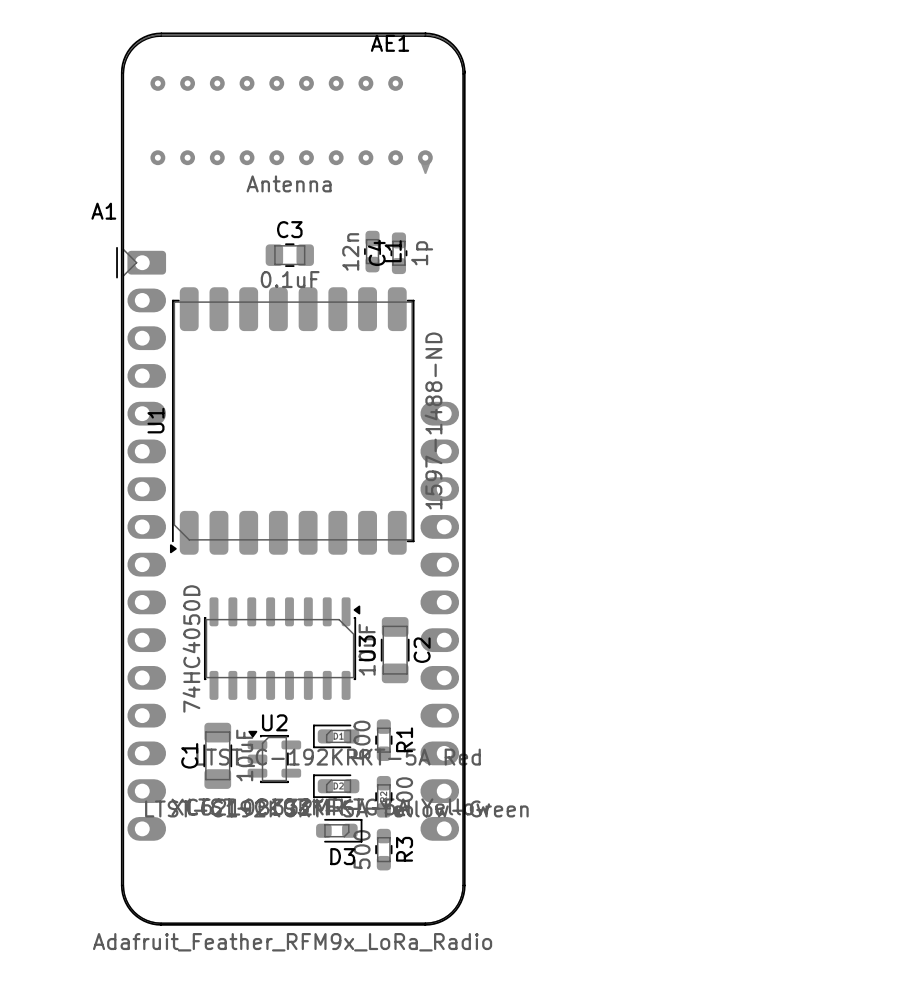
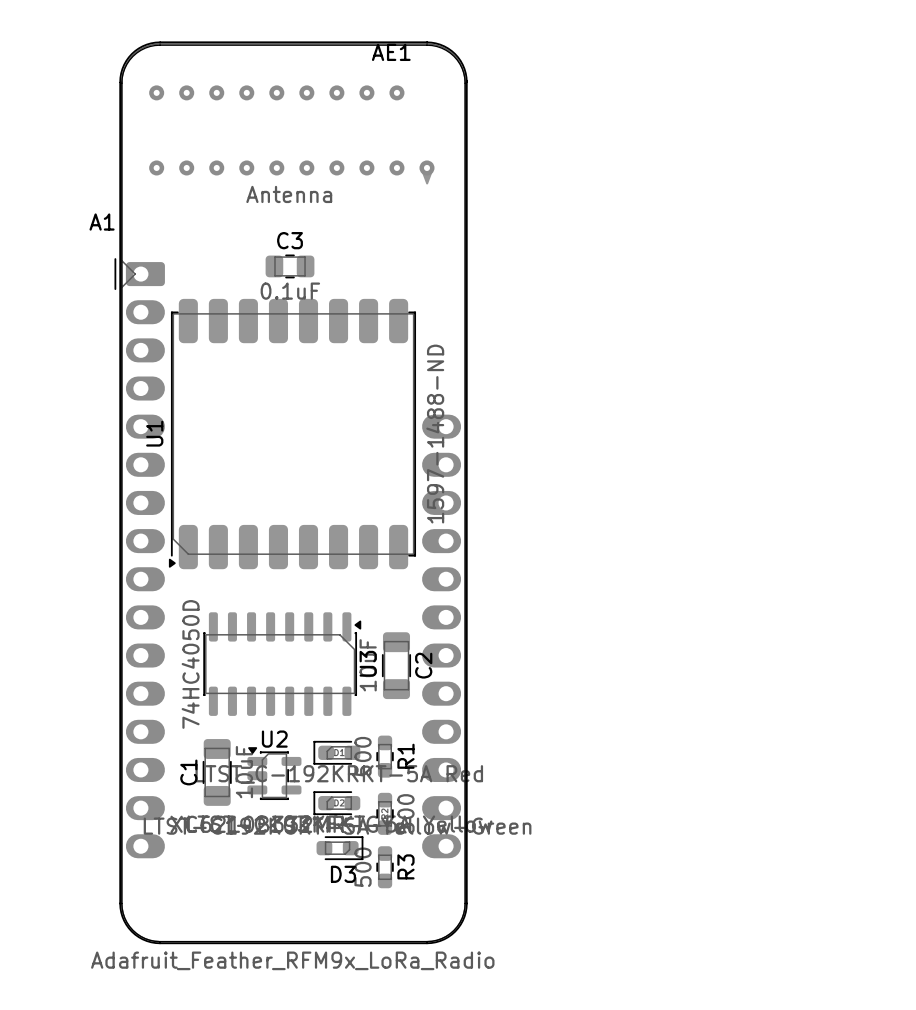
L1: 12n (372, 251) -> none
C4: 1p (398, 253) -> none

